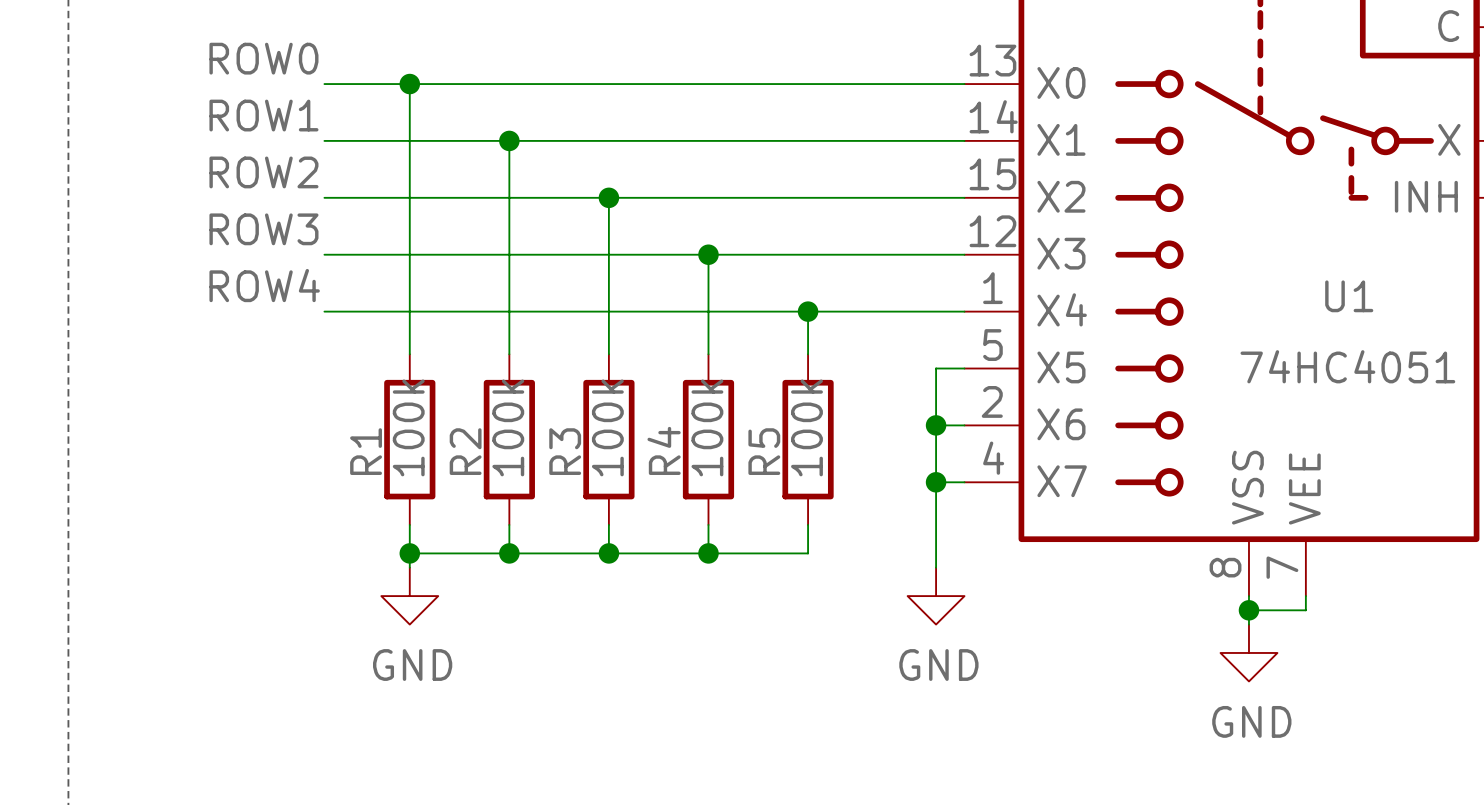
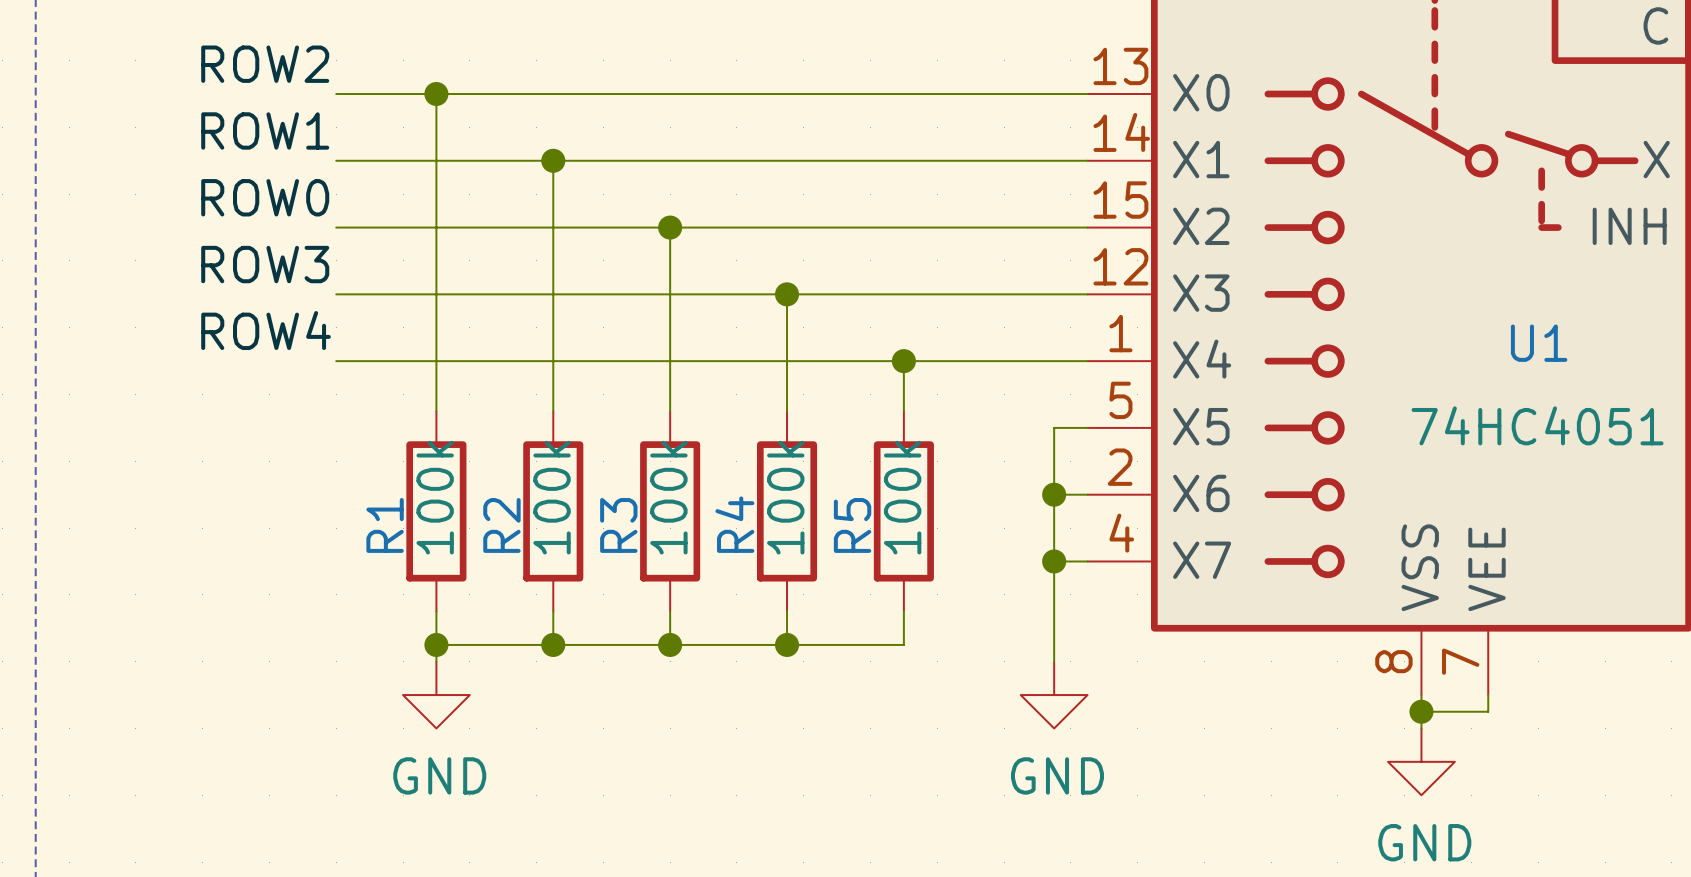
label: ROW0 (263, 58) -> ROW2 (265, 64)
label: ROW2 (263, 172) -> ROW0 (265, 197)

